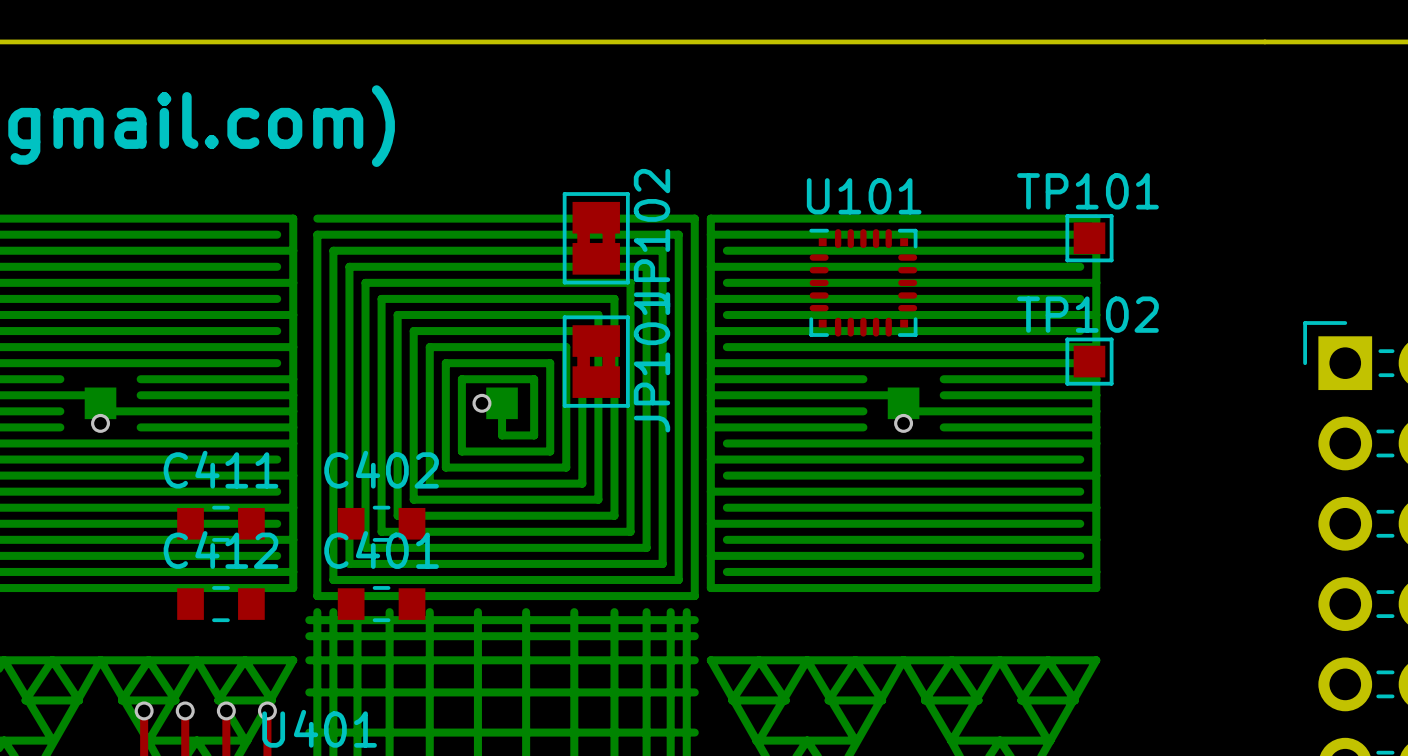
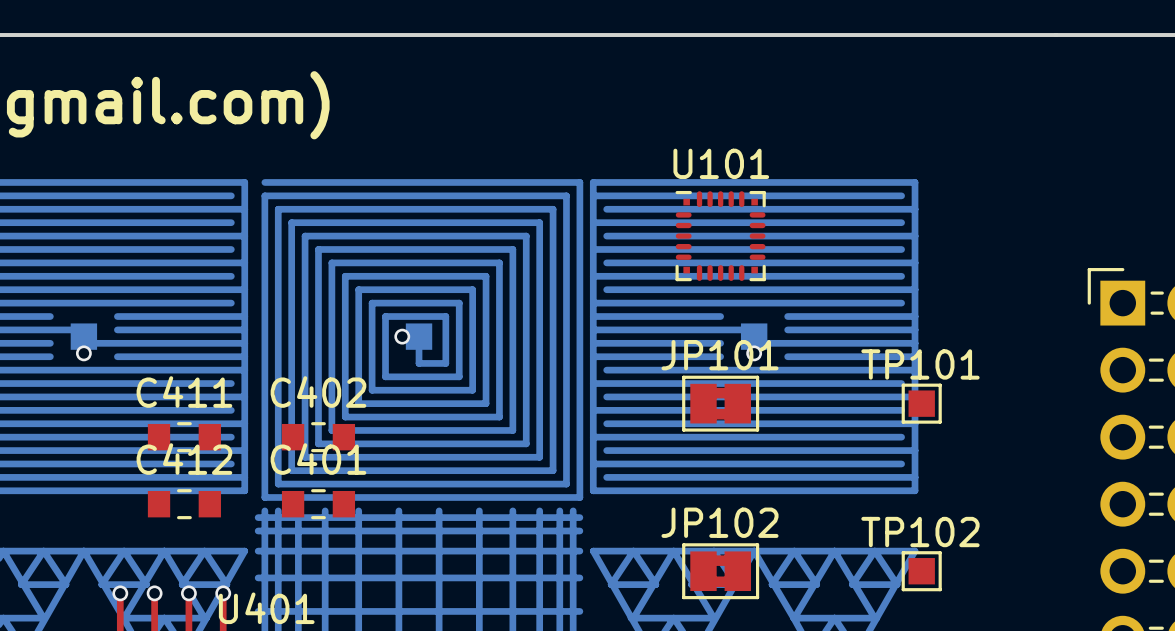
JP102 rotation: 0° (596, 238) -> 90° clockwise (720, 571)
JP102 position: (596, 238) -> (720, 571)
TP101 position: (1089, 238) -> (921, 403)
JP102 name position: JP102 (651, 239) -> JP102 (720, 522)
JP101 rotation: 0° (596, 361) -> 90° clockwise (720, 403)
JP101 position: (596, 361) -> (720, 403)
TP102 position: (1089, 361) -> (921, 571)
JP101 name position: JP101 (651, 362) -> JP101 (720, 355)

